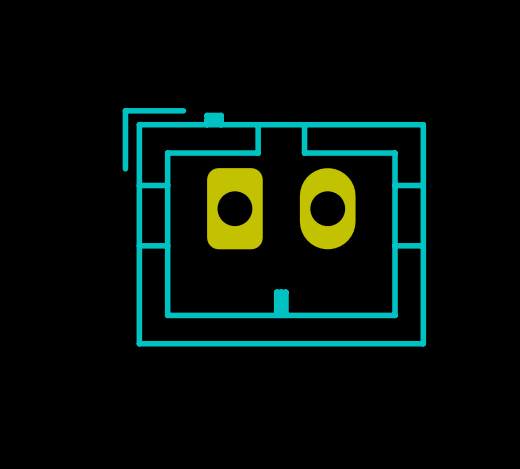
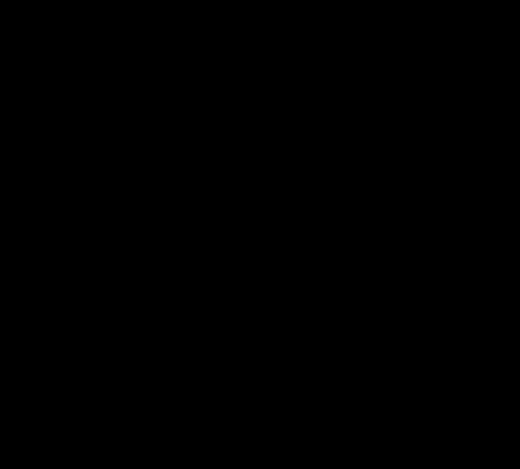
part: (274, 227) -> none

